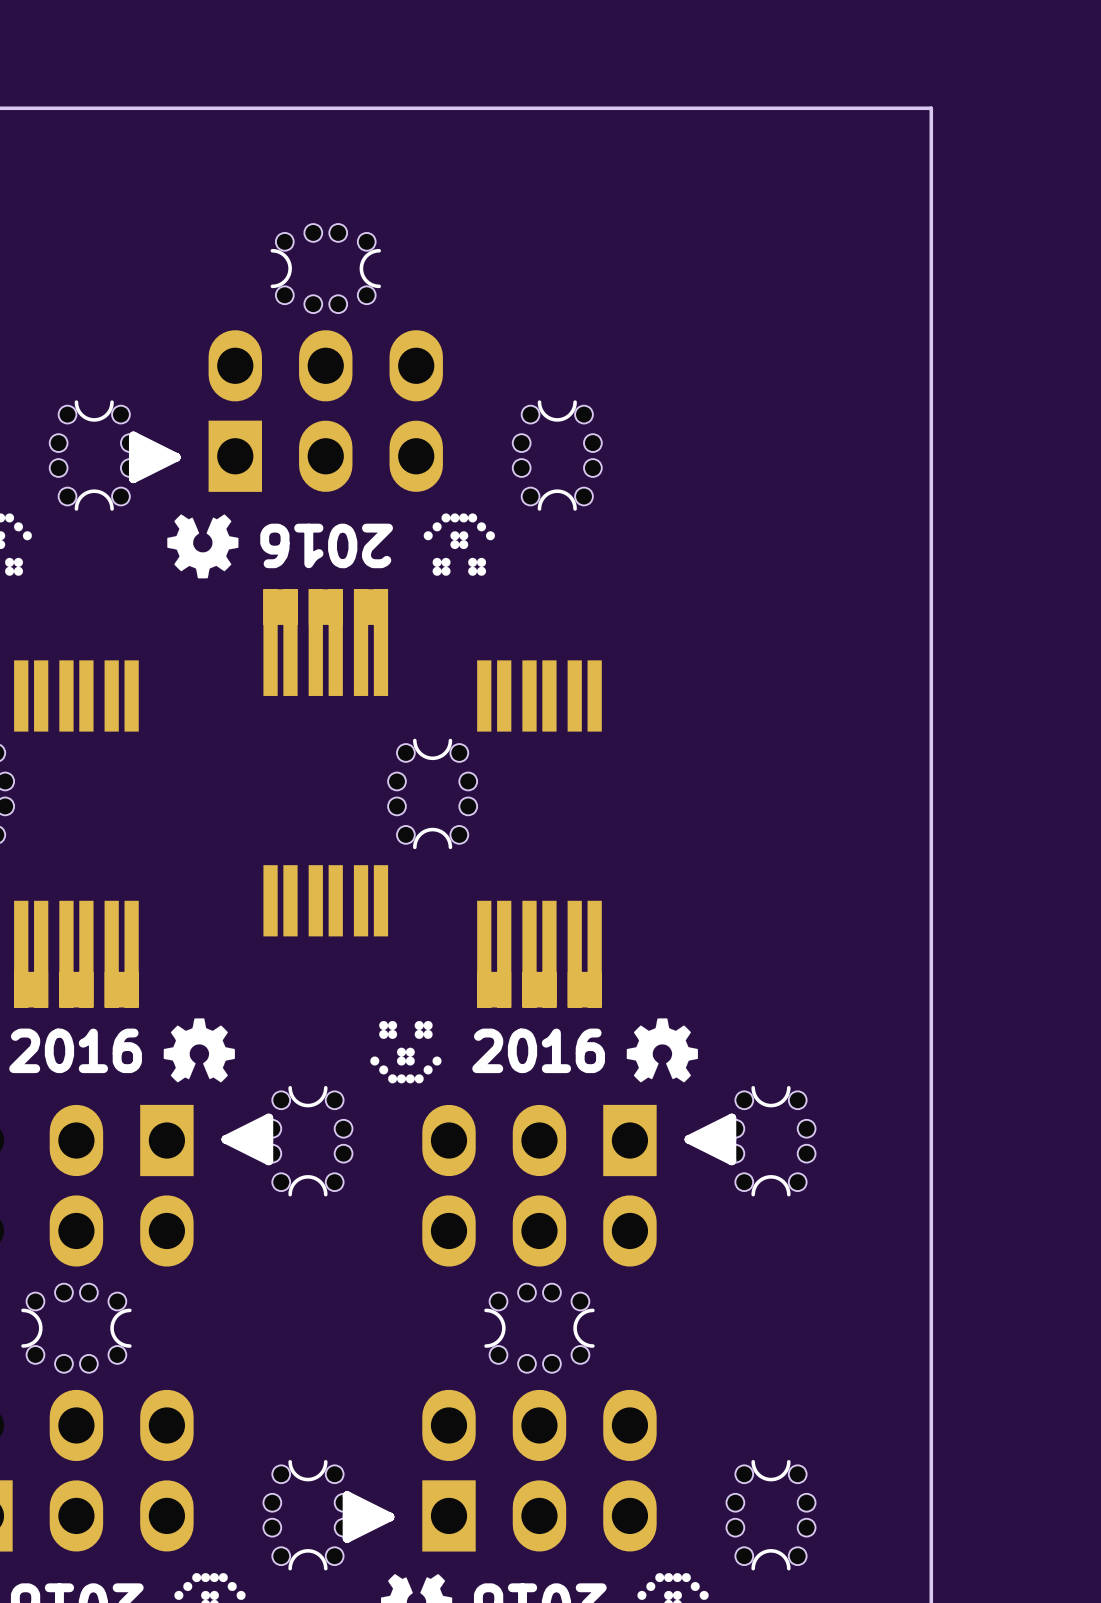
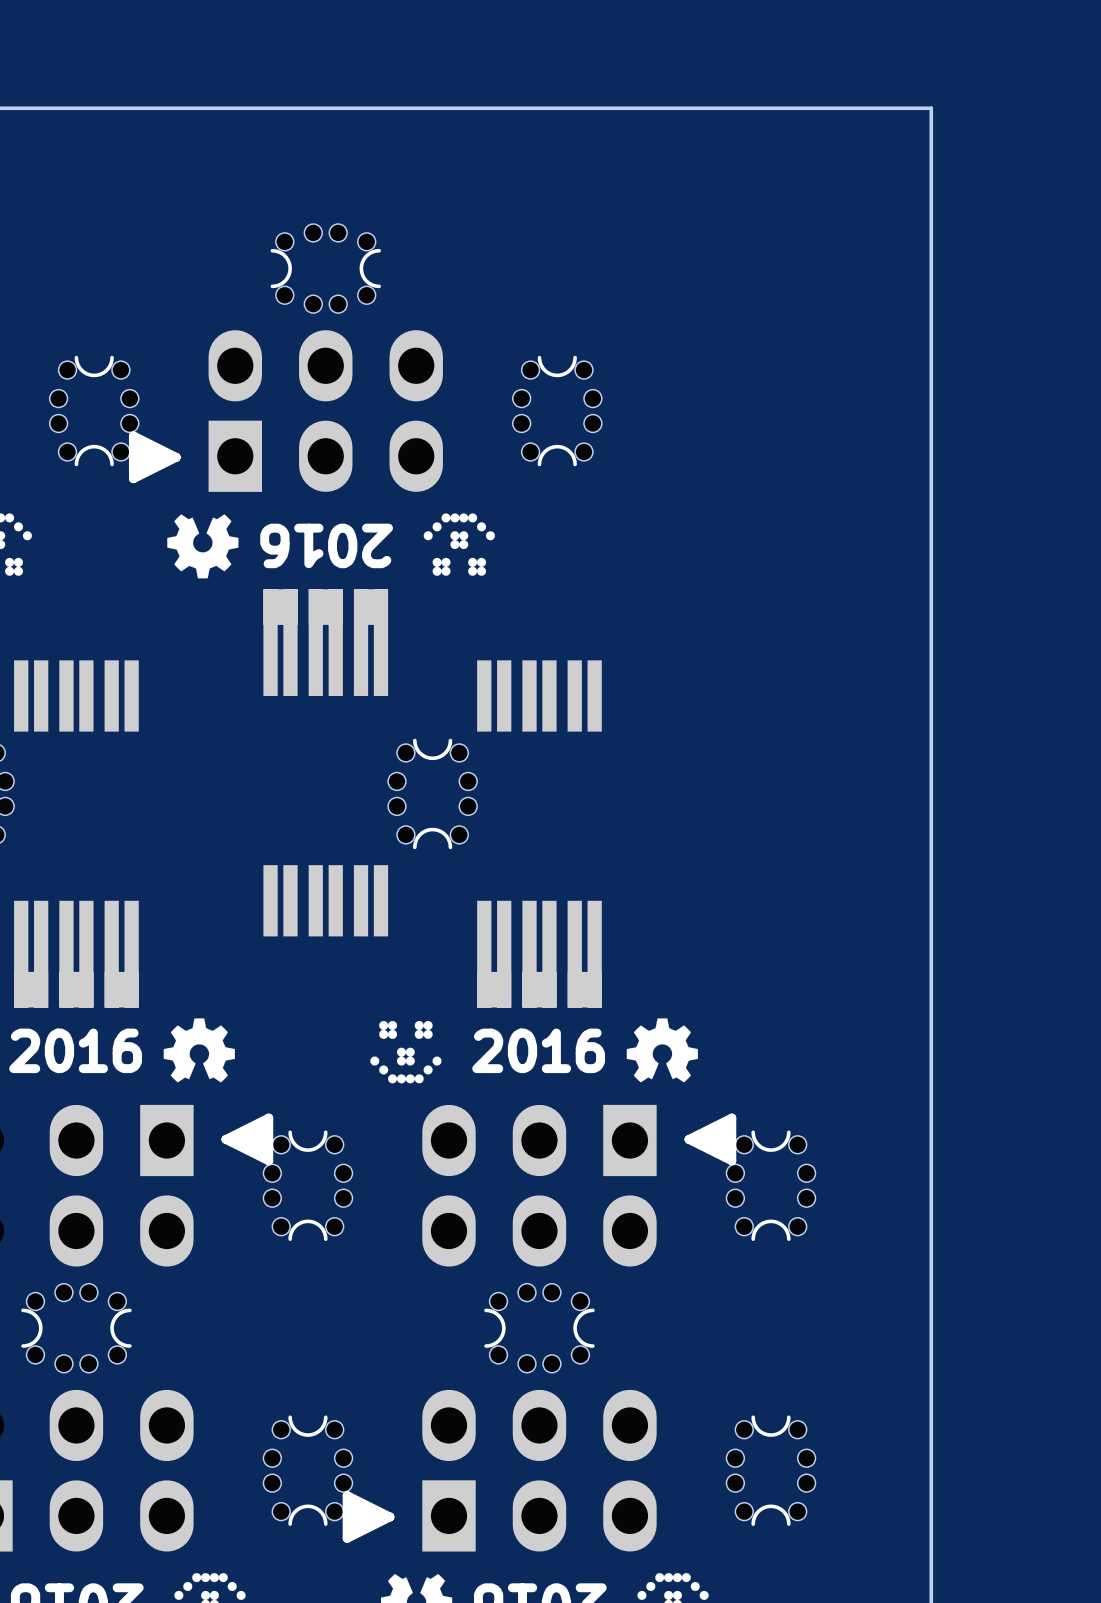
part position: (94, 455) -> (94, 411)
part position: (557, 455) -> (557, 411)
part position: (307, 1141) -> (307, 1185)
part position: (770, 1141) -> (770, 1185)
part position: (307, 1515) -> (307, 1470)
part position: (770, 1515) -> (770, 1470)

